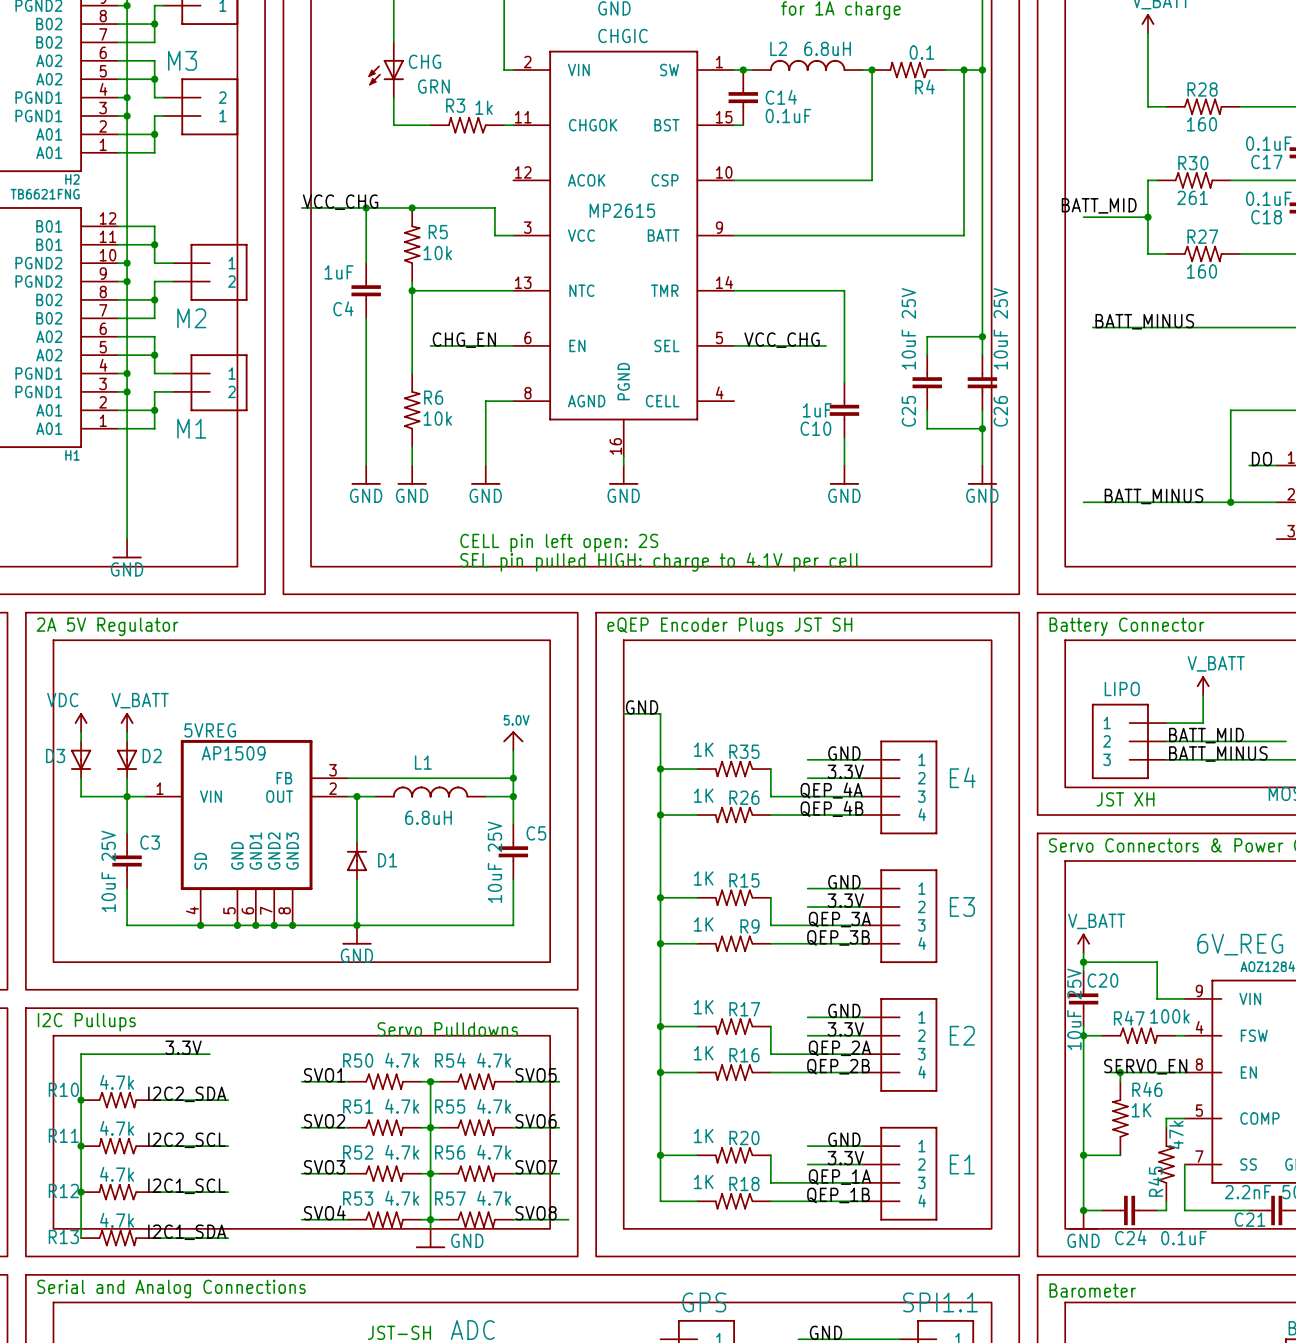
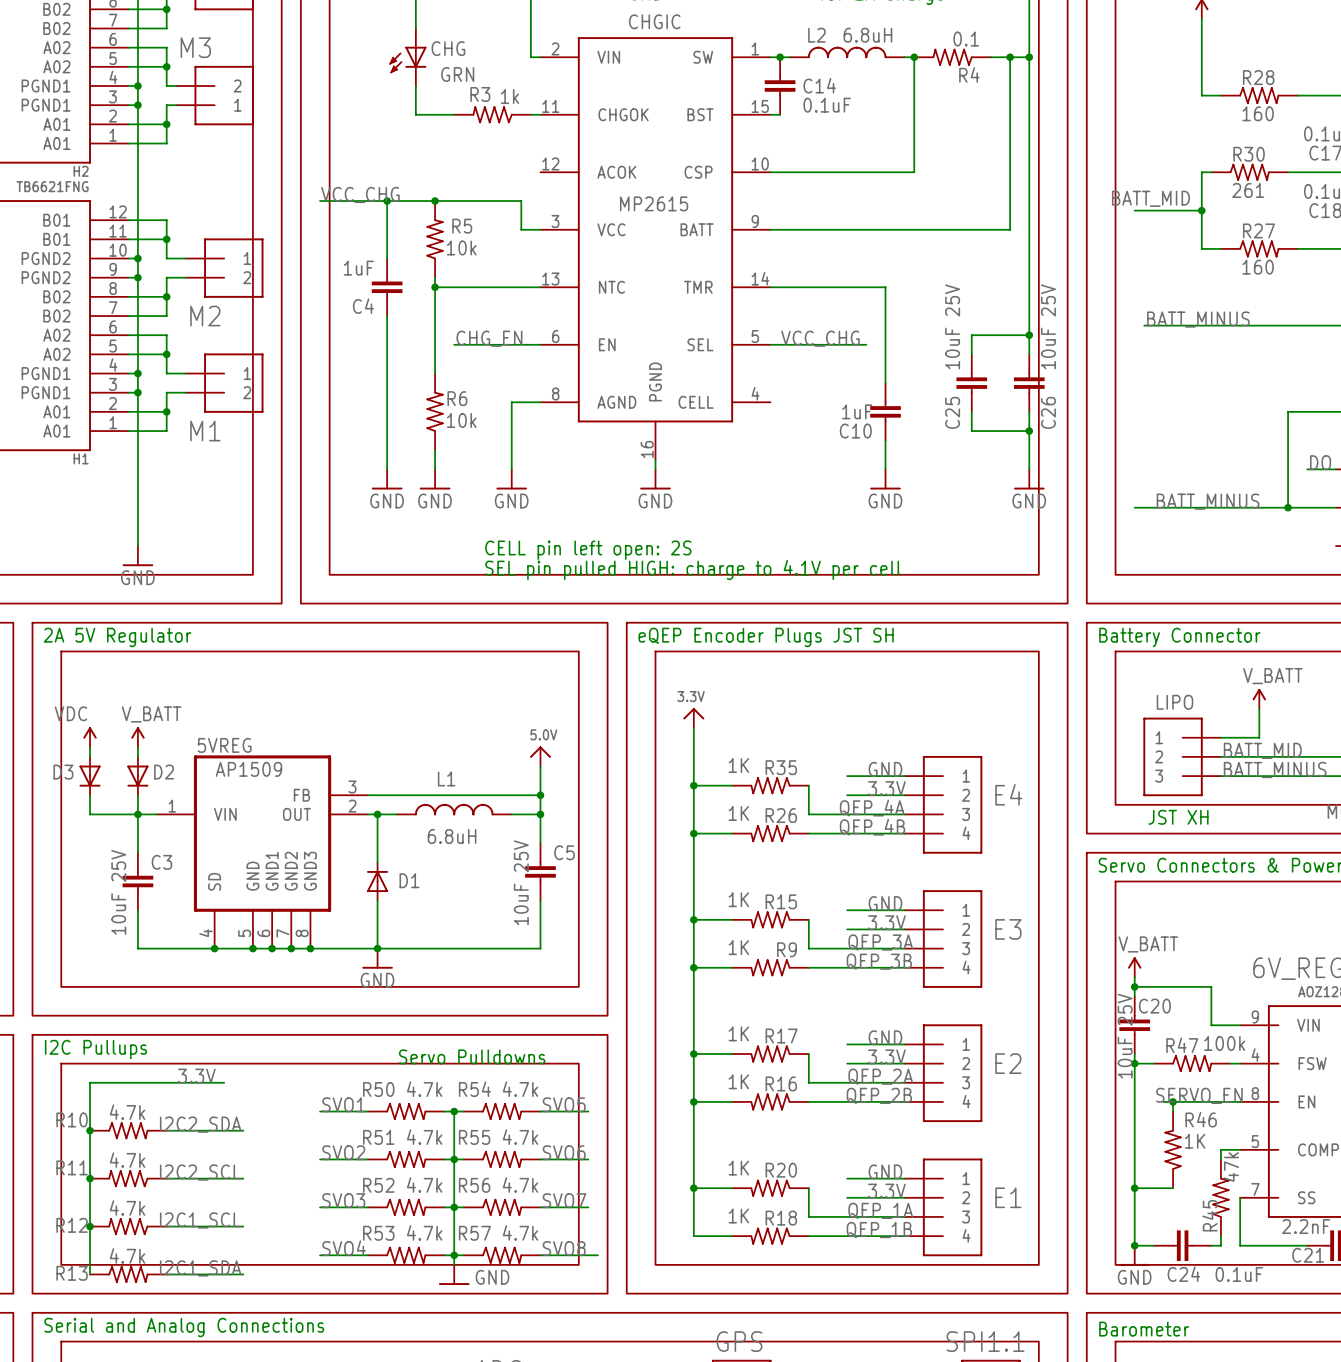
power symbol: none -> 3.3V (693, 718)
label: GND (642, 707) -> none
wire: (623, 713) (660, 713) -> none

